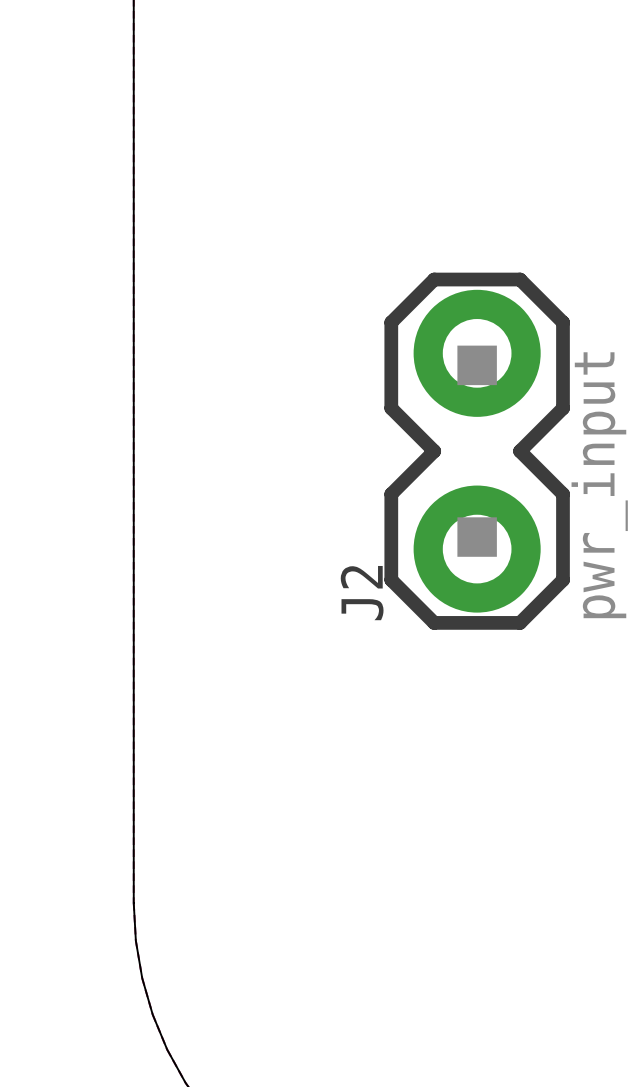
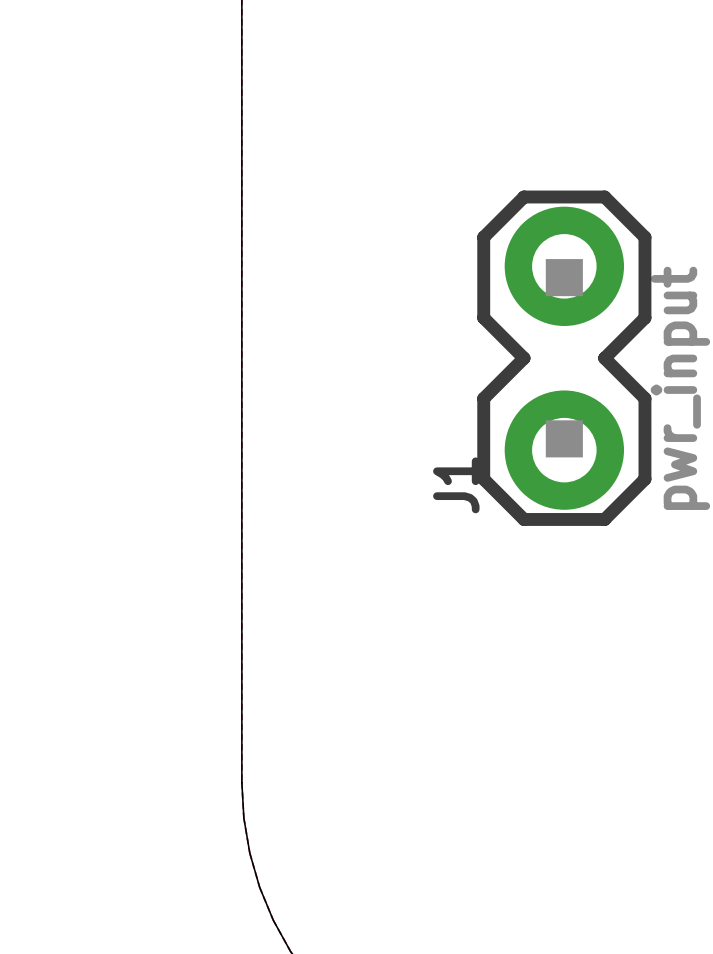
J2 name: J2 (362, 593) -> J1 (456, 485)

